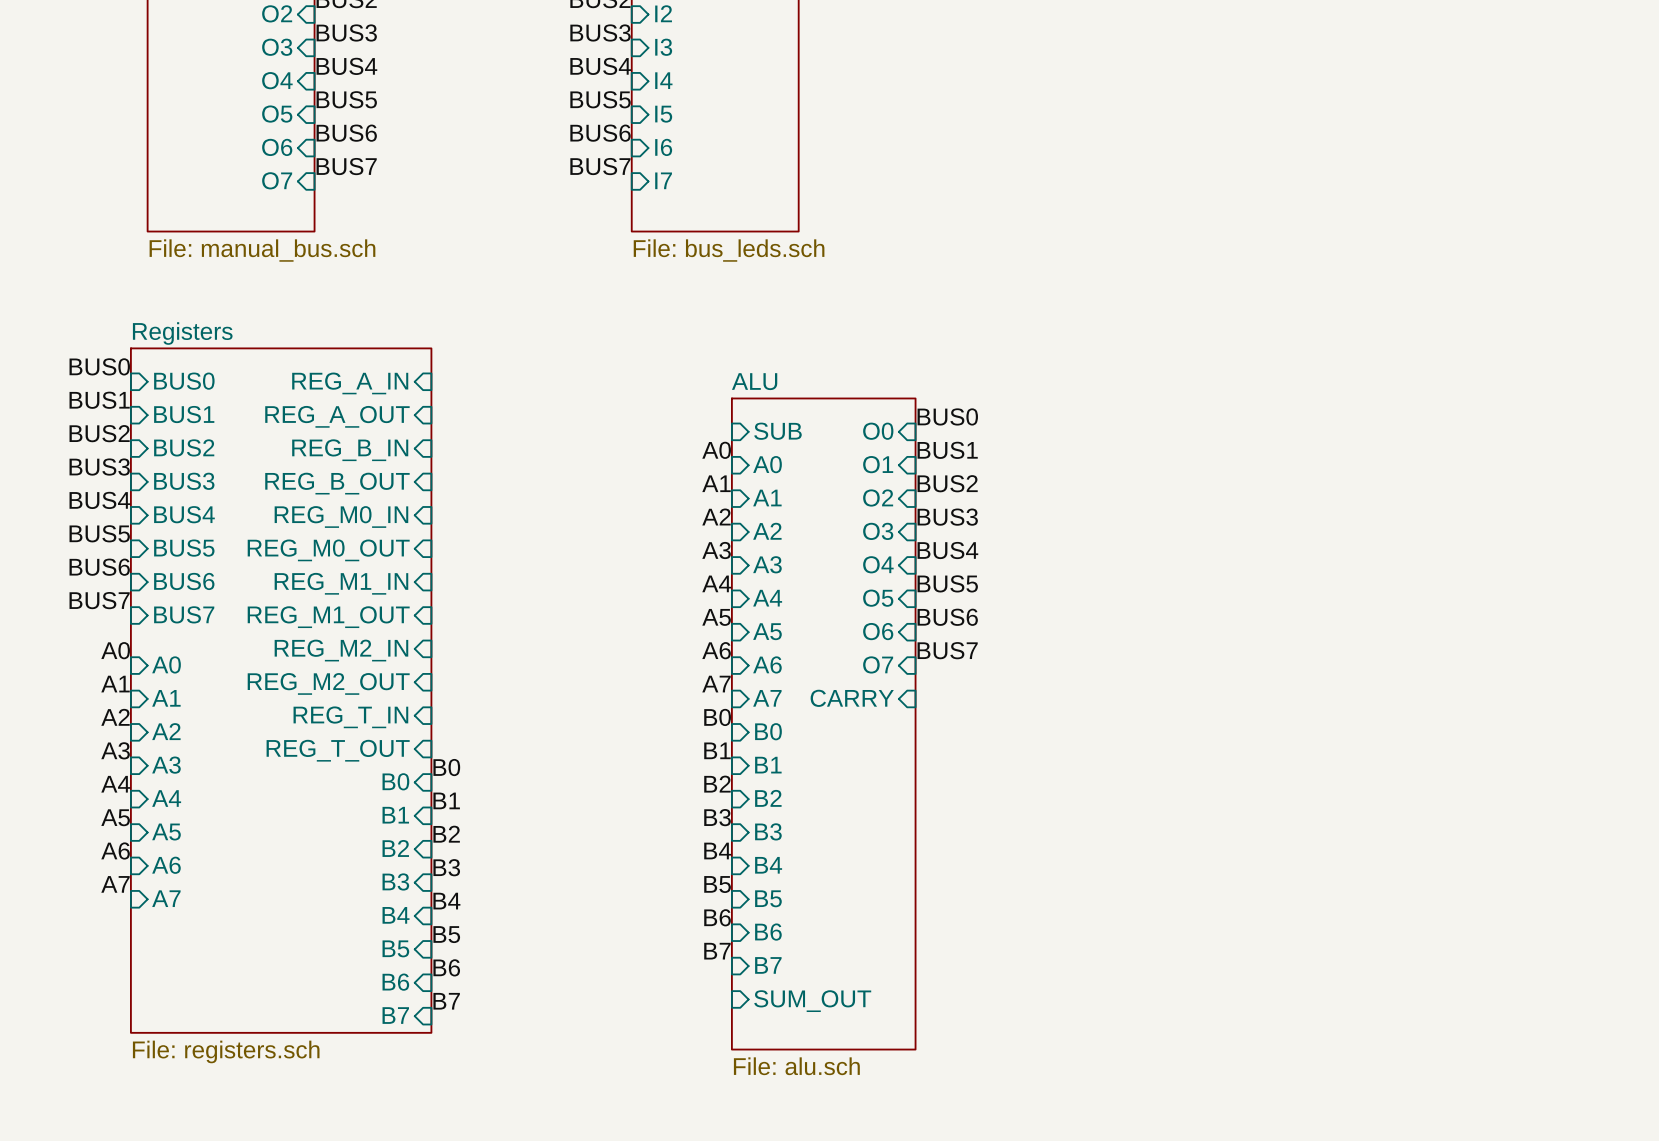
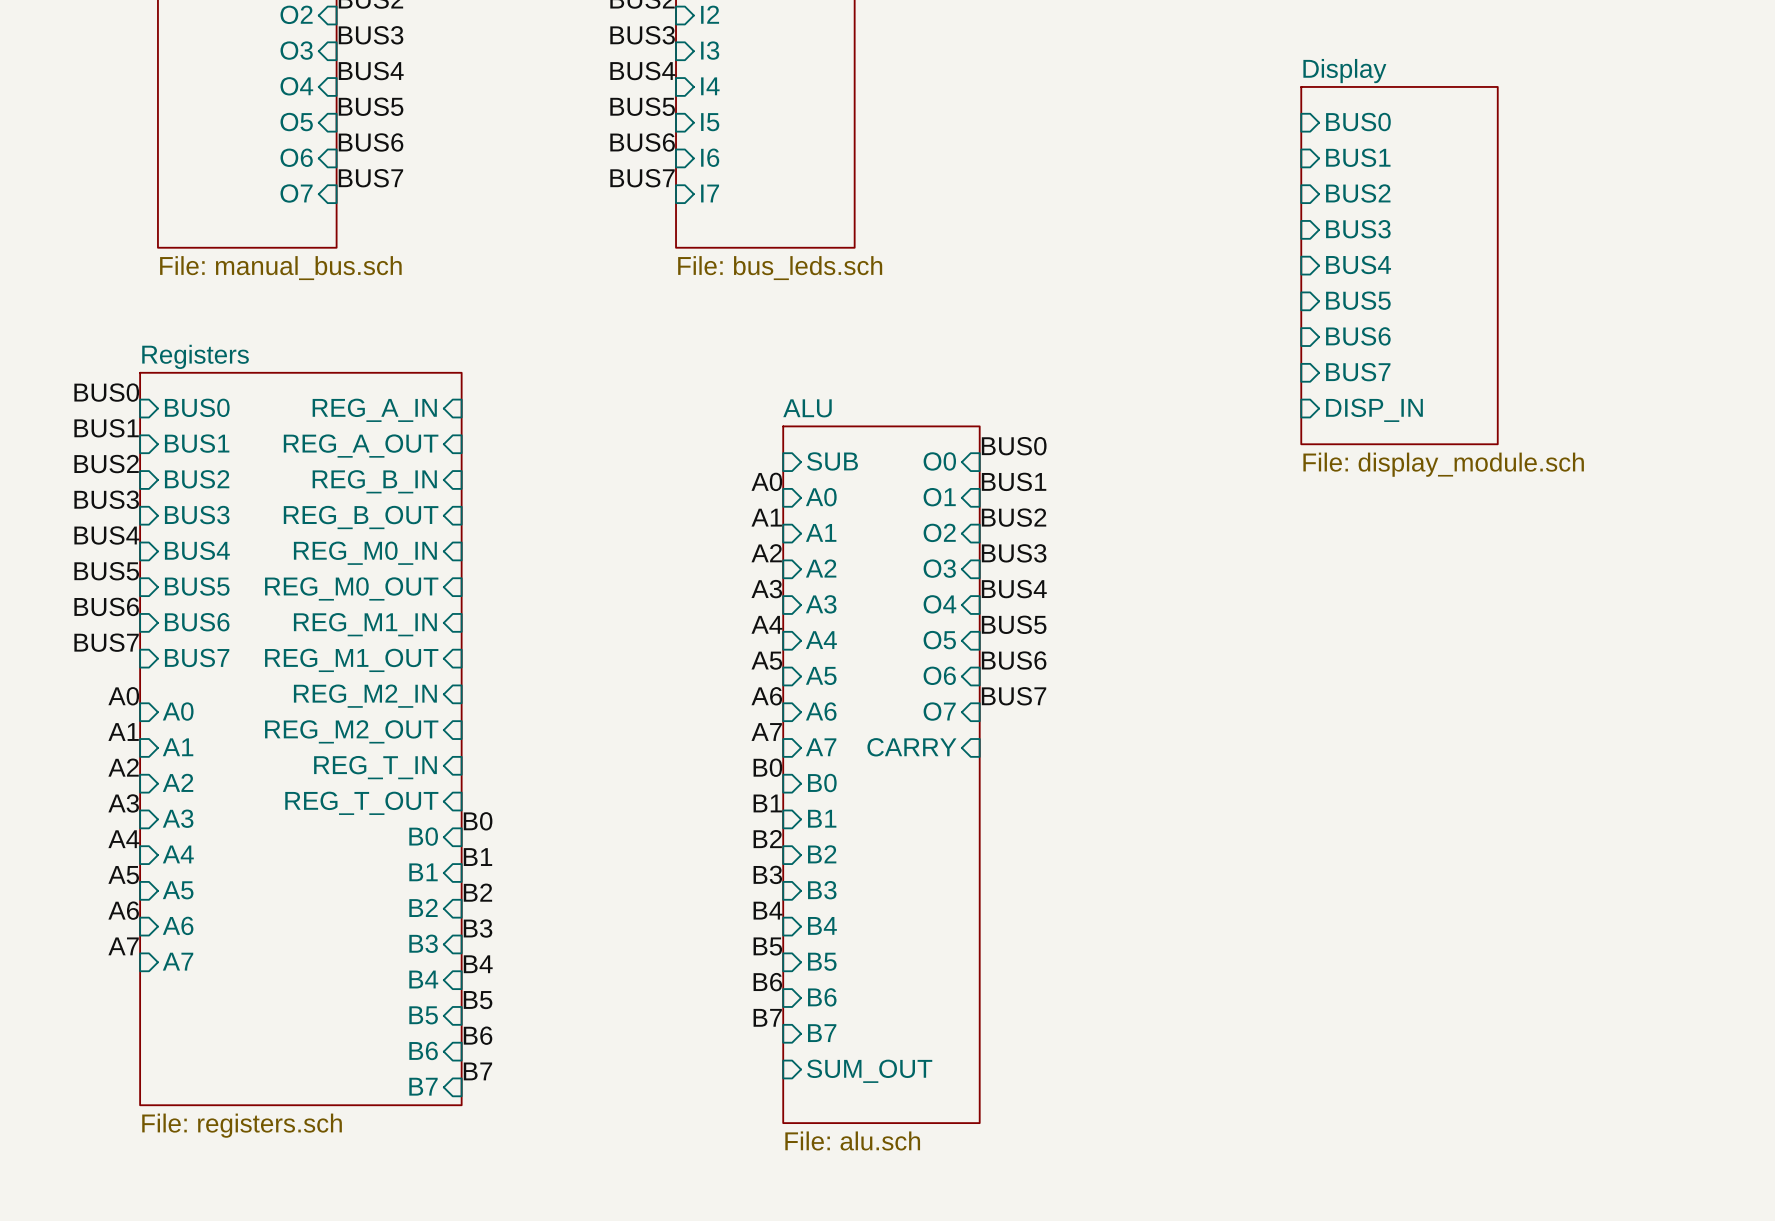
sheet pin: none -> BUS0 (1358, 122)
sheet pin: none -> BUS1 (1358, 157)
sheet pin: none -> BUS2 (1358, 193)
sheet pin: none -> BUS3 (1358, 229)
sheet pin: none -> BUS4 (1358, 264)
sheet Display: none -> File: display_module.sch (1399, 265)
sheet pin: none -> BUS5 (1358, 300)
sheet pin: none -> BUS6 (1358, 336)
sheet pin: none -> BUS7 (1358, 372)
sheet pin: none -> DISP_IN (1374, 410)

